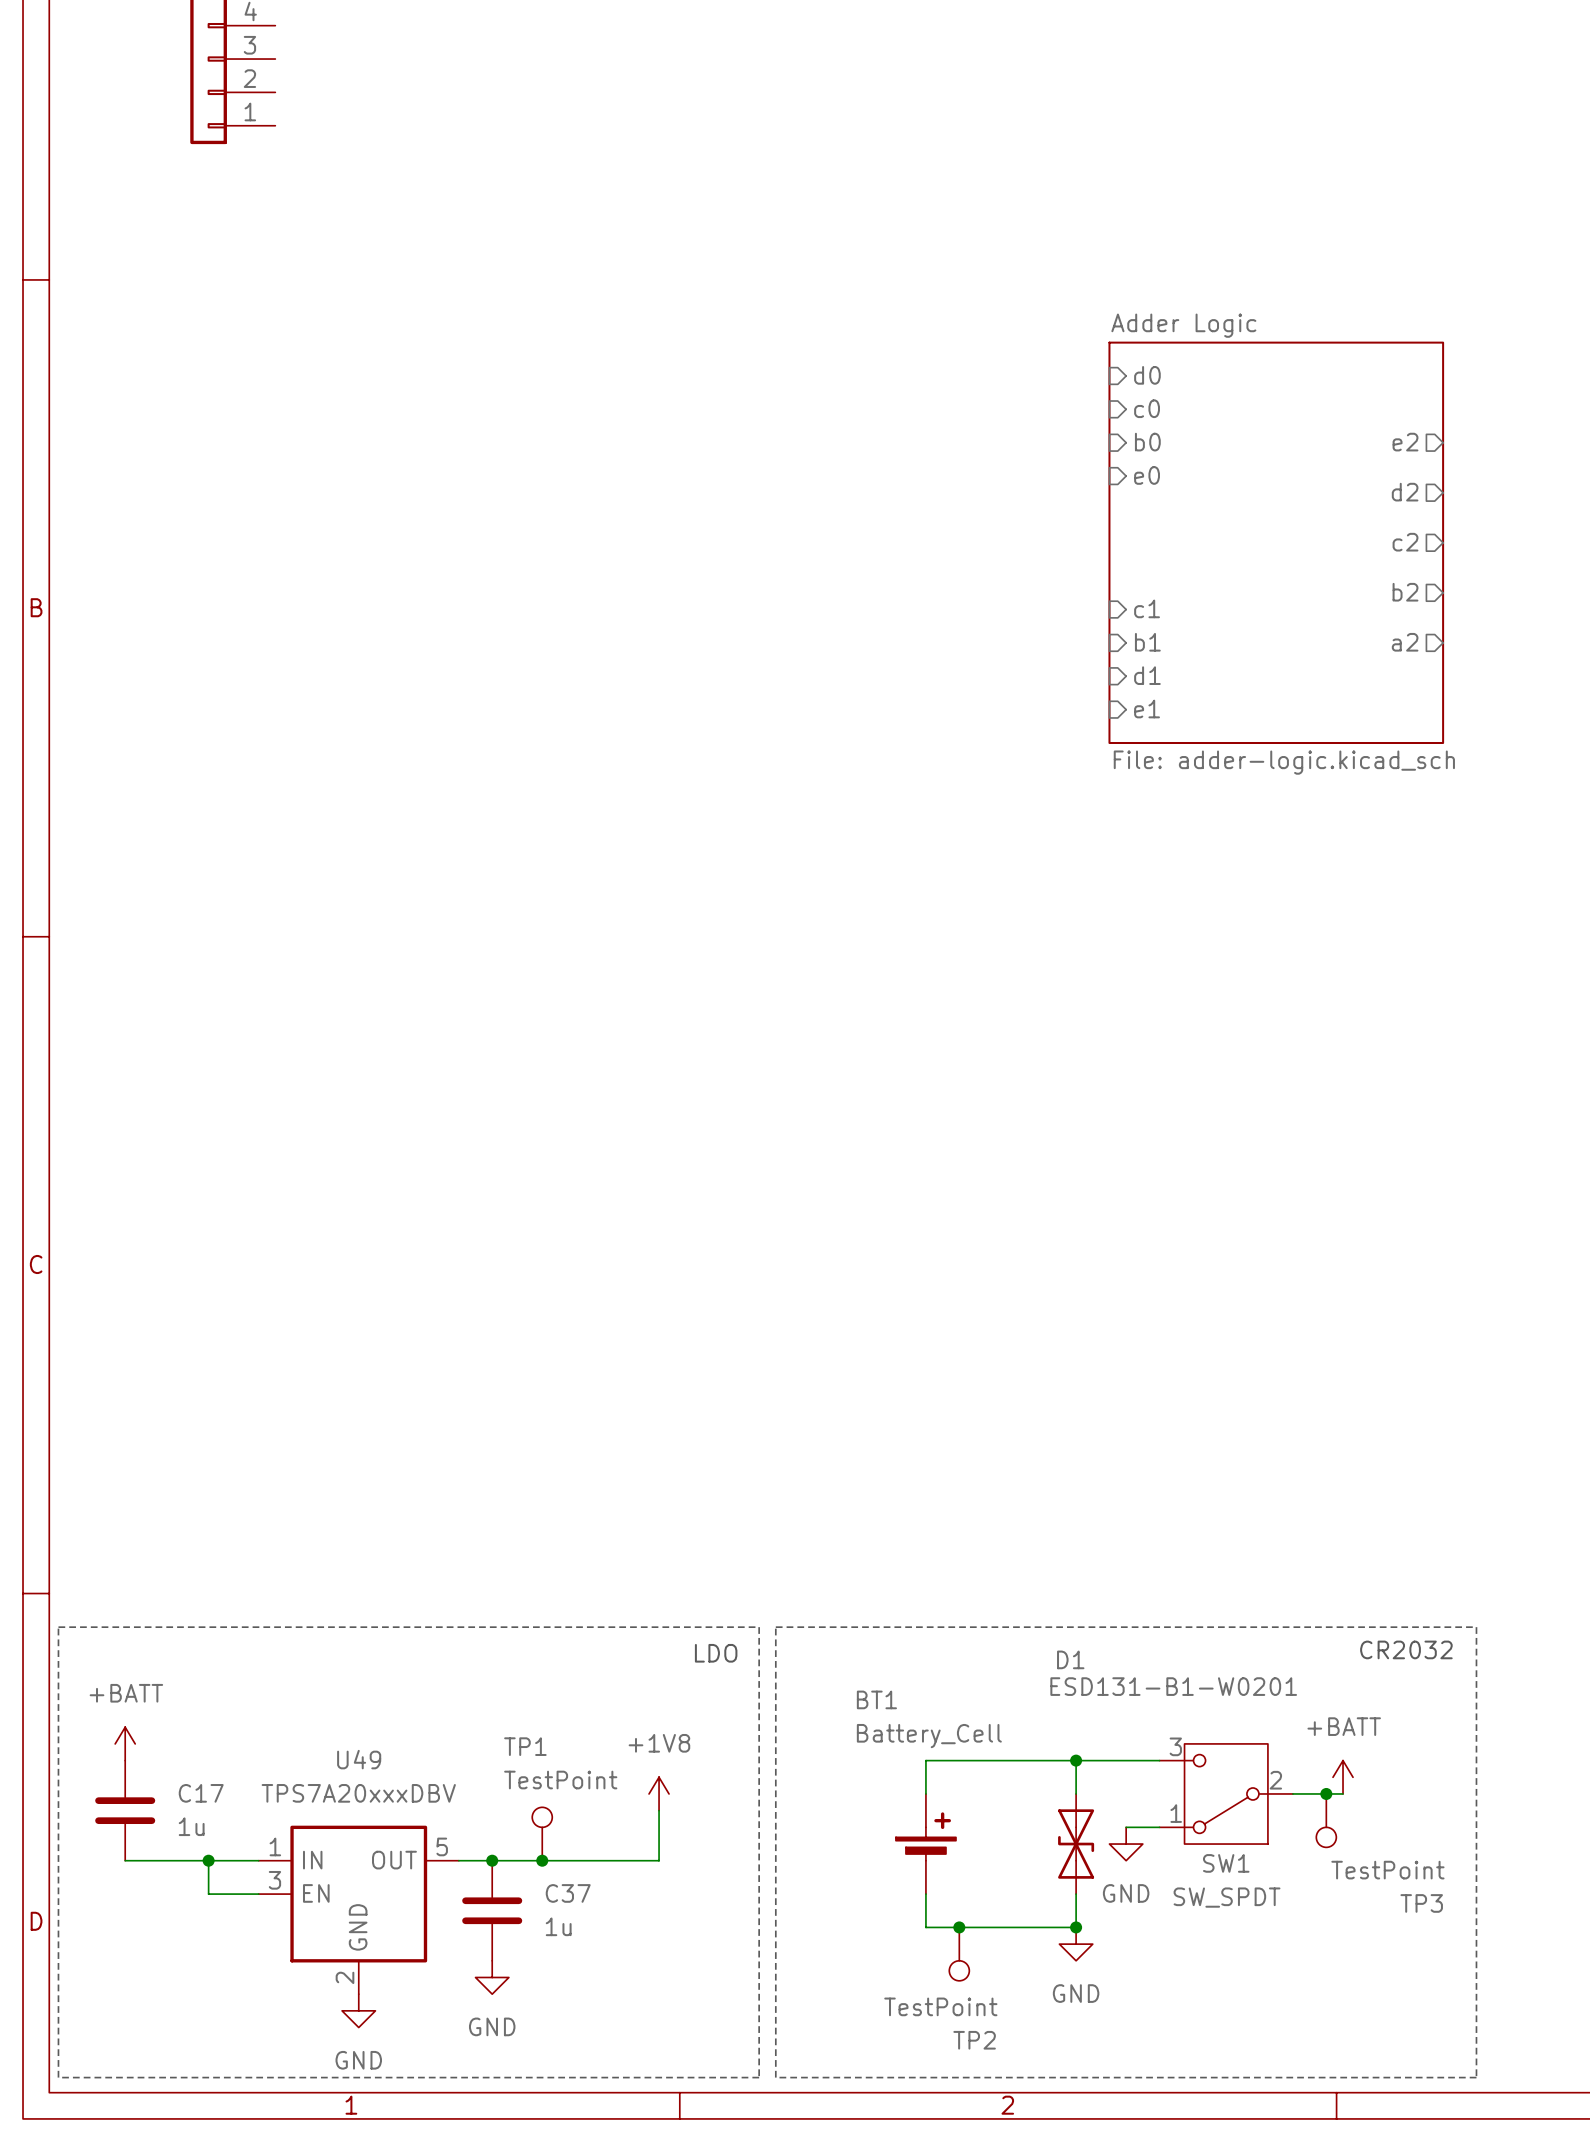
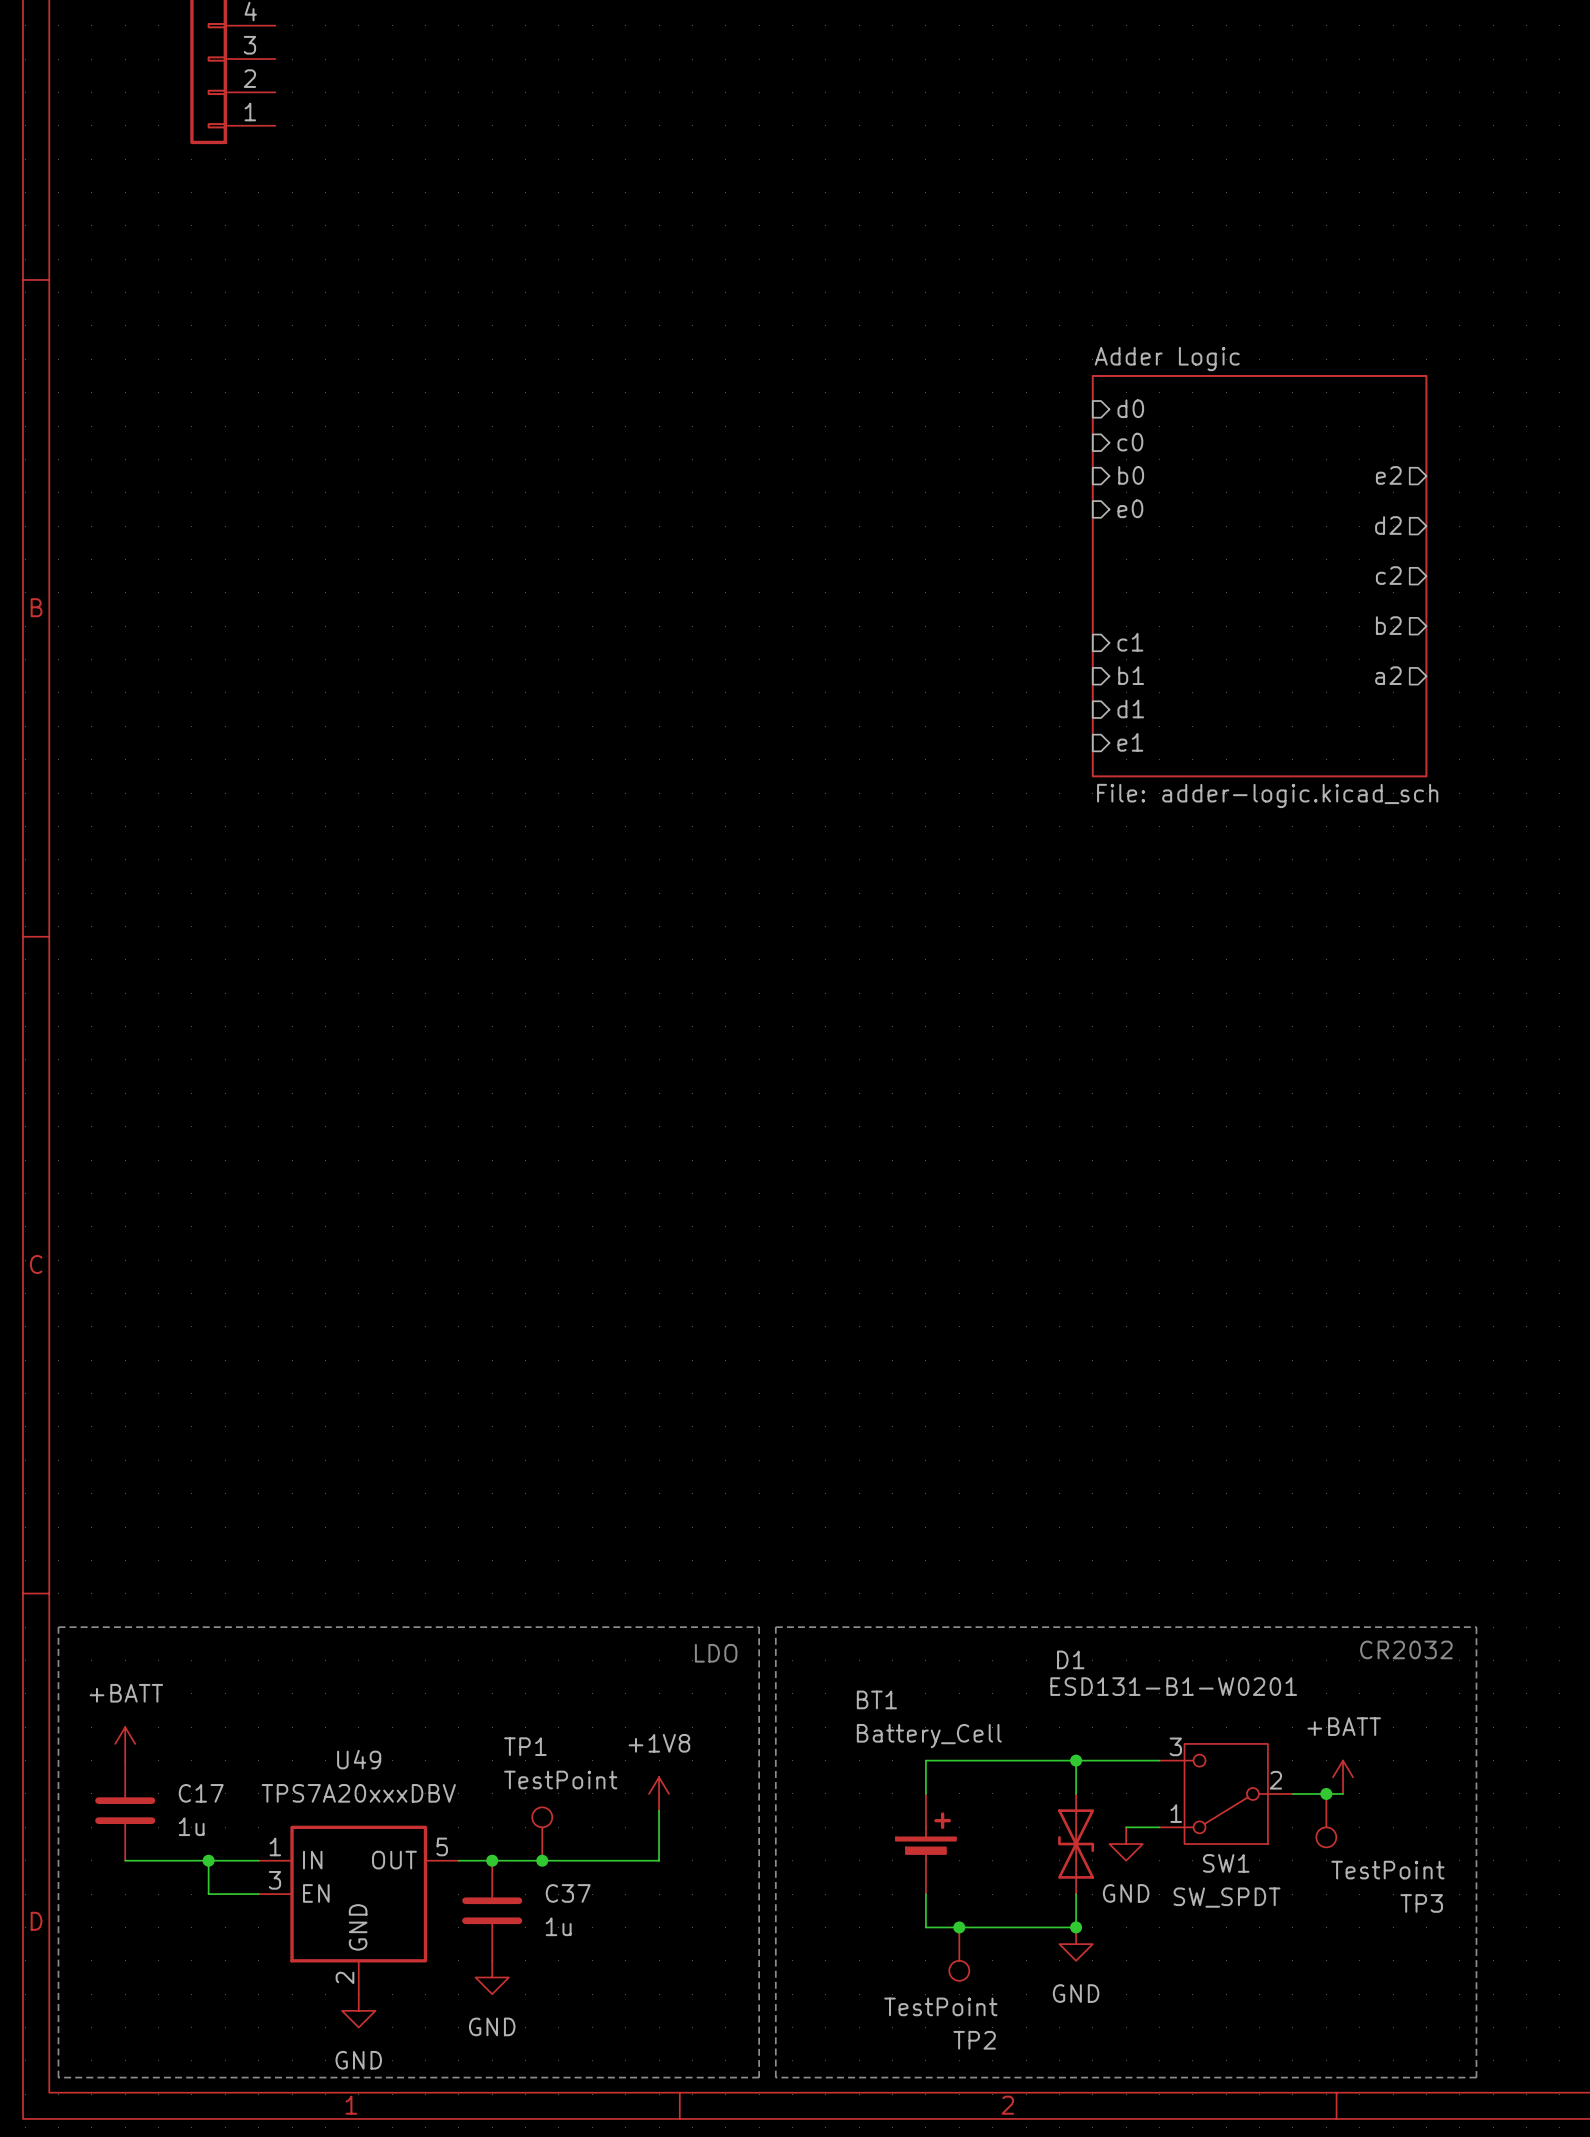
sheet pin position: d0 (1147, 375) -> d0 (1130, 408)
sheet pin position: c0 (1147, 408) -> c0 (1130, 442)
sheet pin position: b0 (1147, 442) -> b0 (1131, 475)
sheet pin position: e2 (1405, 442) -> e2 (1388, 475)
sheet pin position: e0 (1147, 475) -> e0 (1130, 508)
sheet pin position: d2 (1405, 492) -> d2 (1388, 525)
sheet Adder Logic position: (1276, 542) -> (1259, 576)
sheet pin position: c2 (1405, 542) -> c2 (1388, 575)
sheet pin position: b2 (1405, 592) -> b2 (1388, 625)
sheet pin position: c1 (1147, 608) -> c1 (1130, 642)
sheet pin position: b1 (1147, 642) -> b1 (1131, 675)
sheet pin position: a2 (1405, 642) -> a2 (1388, 675)
sheet pin position: d1 (1147, 675) -> d1 (1130, 709)
sheet pin position: e1 (1147, 709) -> e1 (1130, 742)

